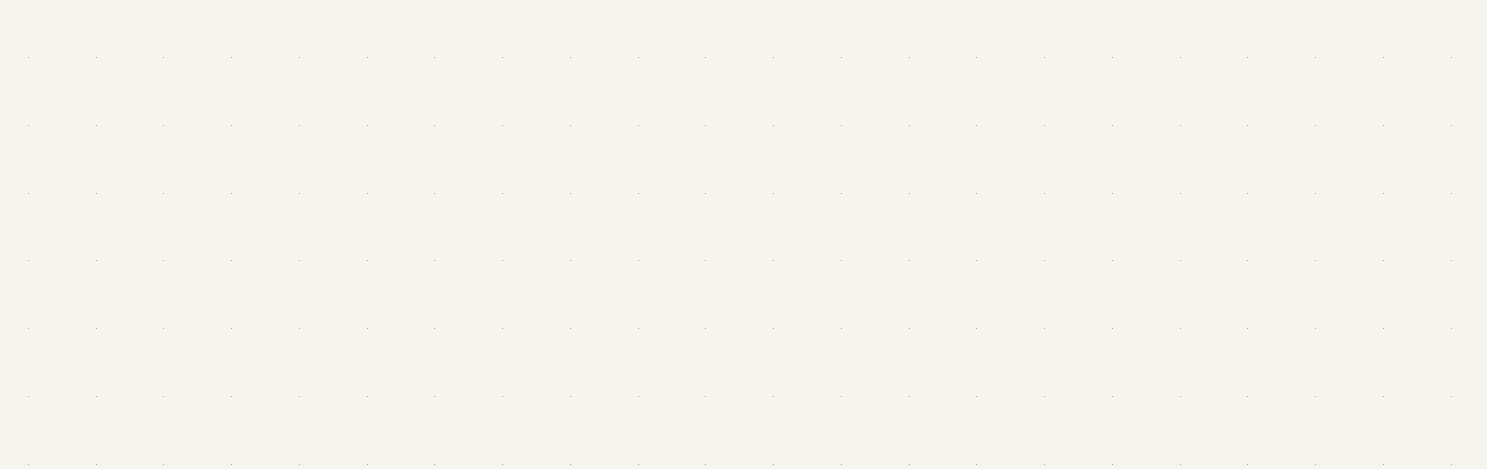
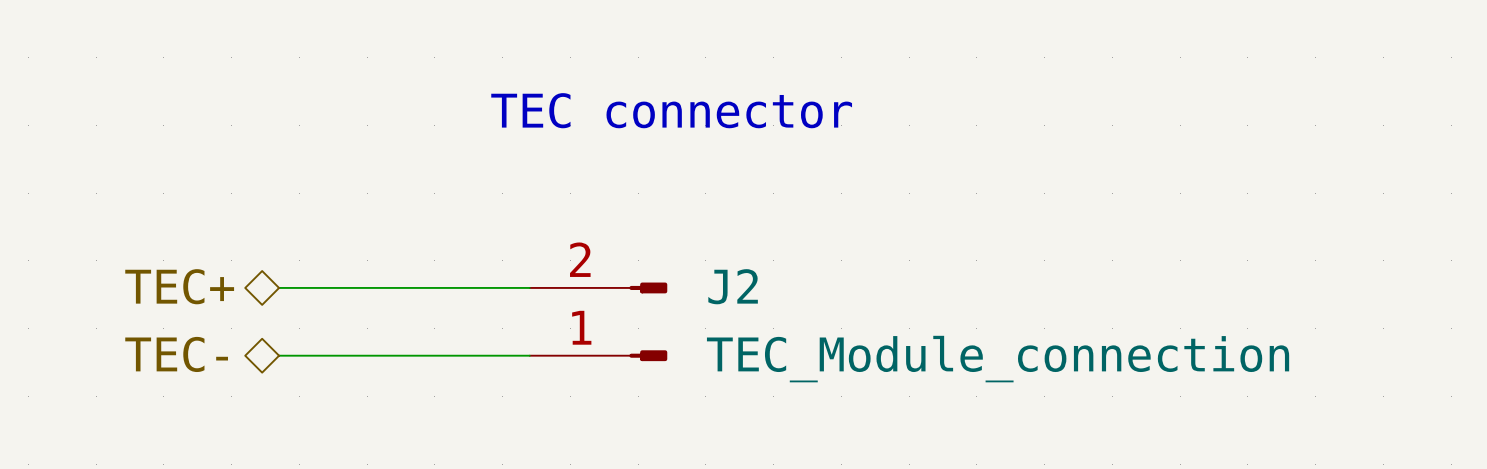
text: none -> TEC connector (671, 110)
hierarchical label: none -> TEC+ (179, 286)
wire: none -> (279, 287) (529, 287)
J2: none -> TEC_Module_connection (598, 321)
hierarchical label: none -> TEC- (176, 354)
wire: none -> (279, 355) (529, 355)

